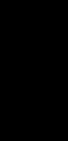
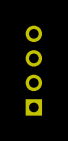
part: none -> (33, 70)

